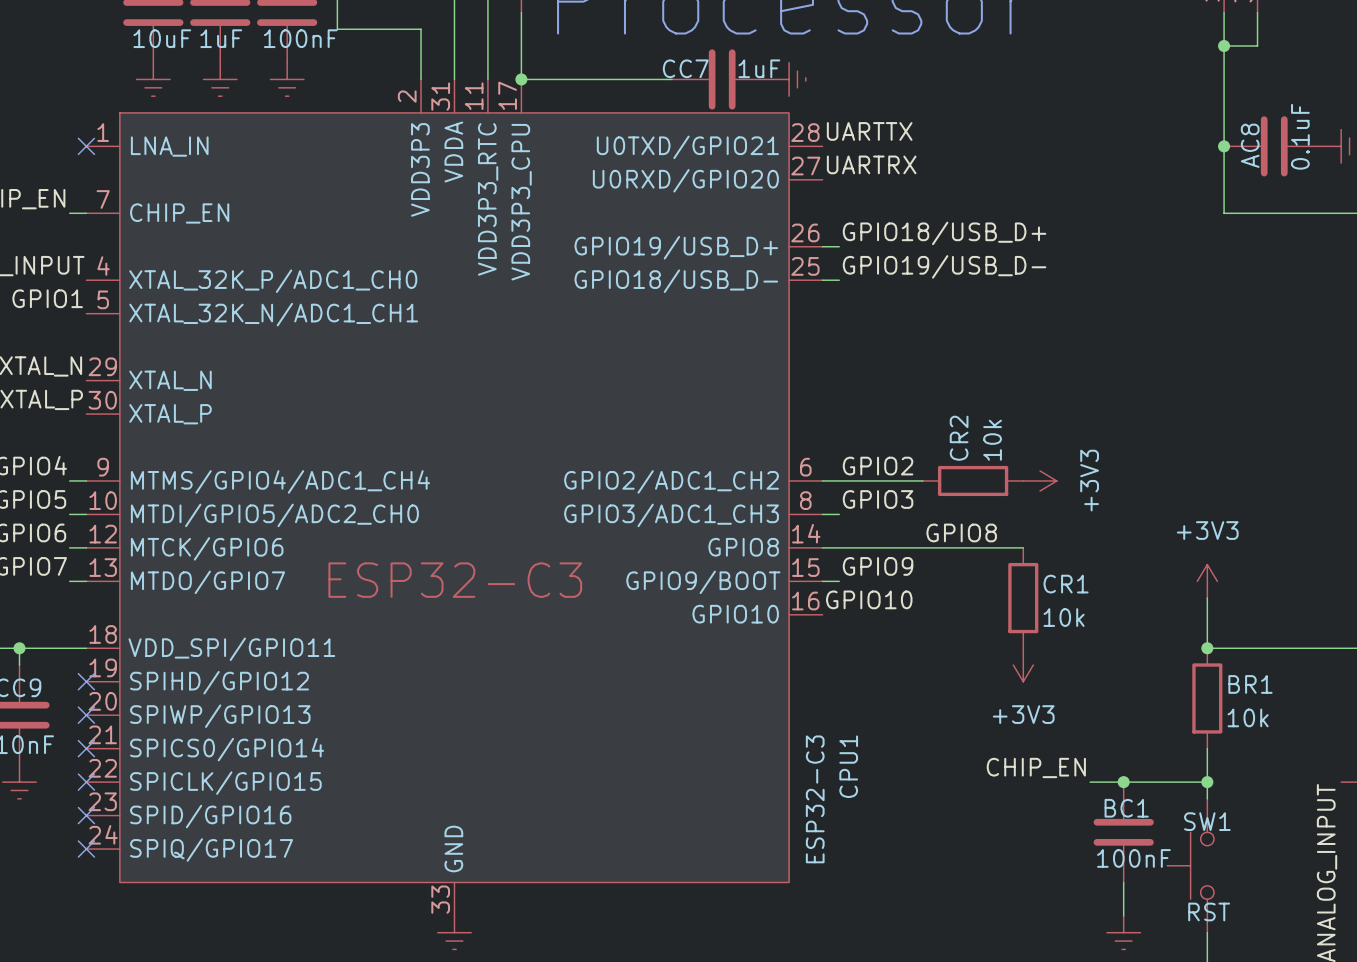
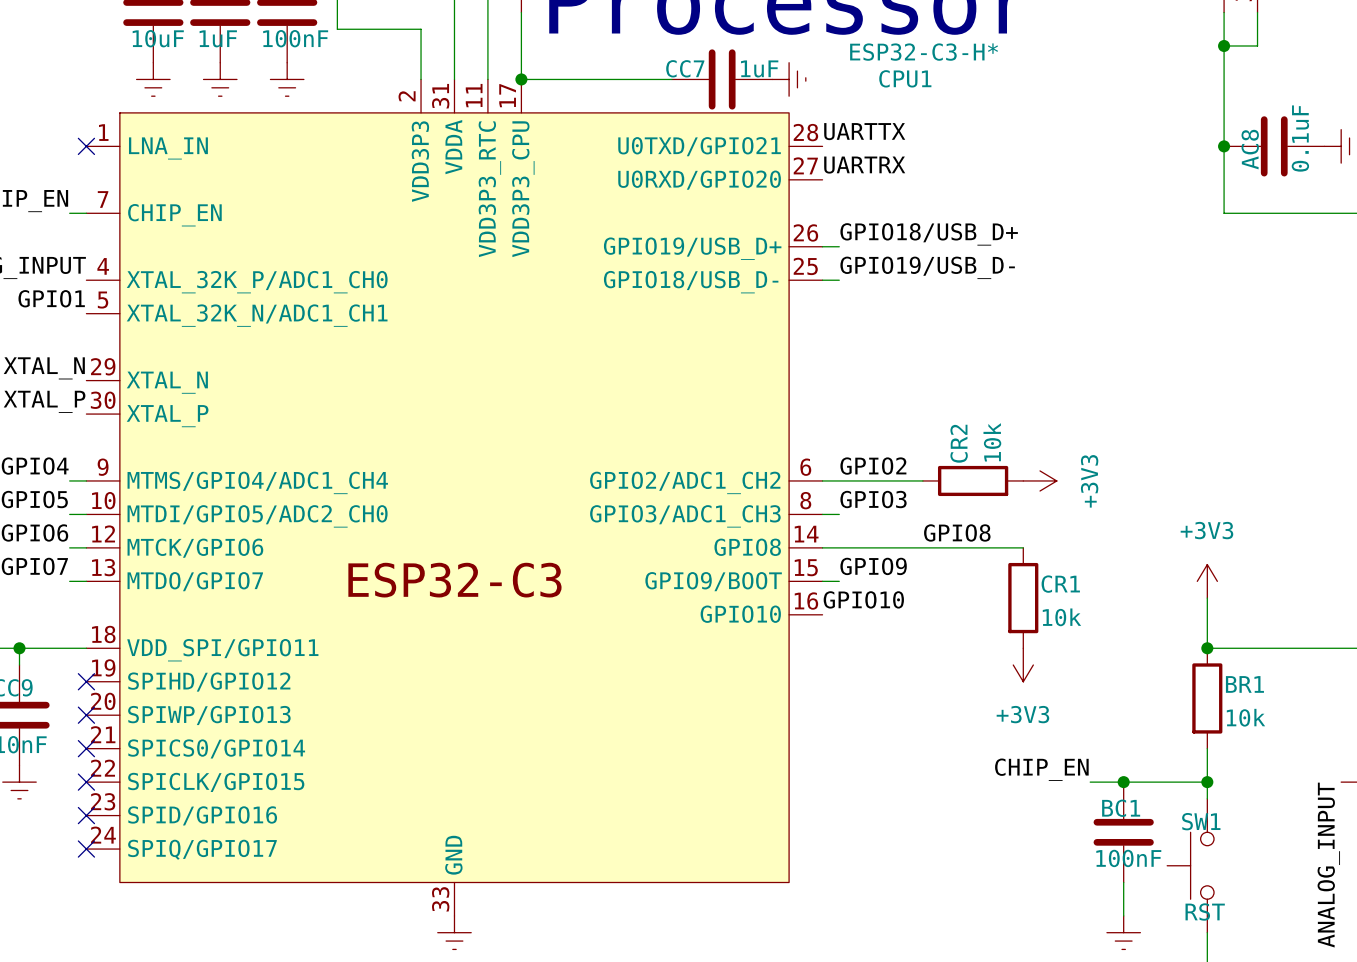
CPU1 name rotation: 0° (848, 766) -> 90° clockwise (905, 78)
CPU1 name position: CPU1 (848, 766) -> CPU1 (905, 78)
CPU1 value: ESP32-C3 (815, 799) -> ESP32-C3-H* (924, 52)

